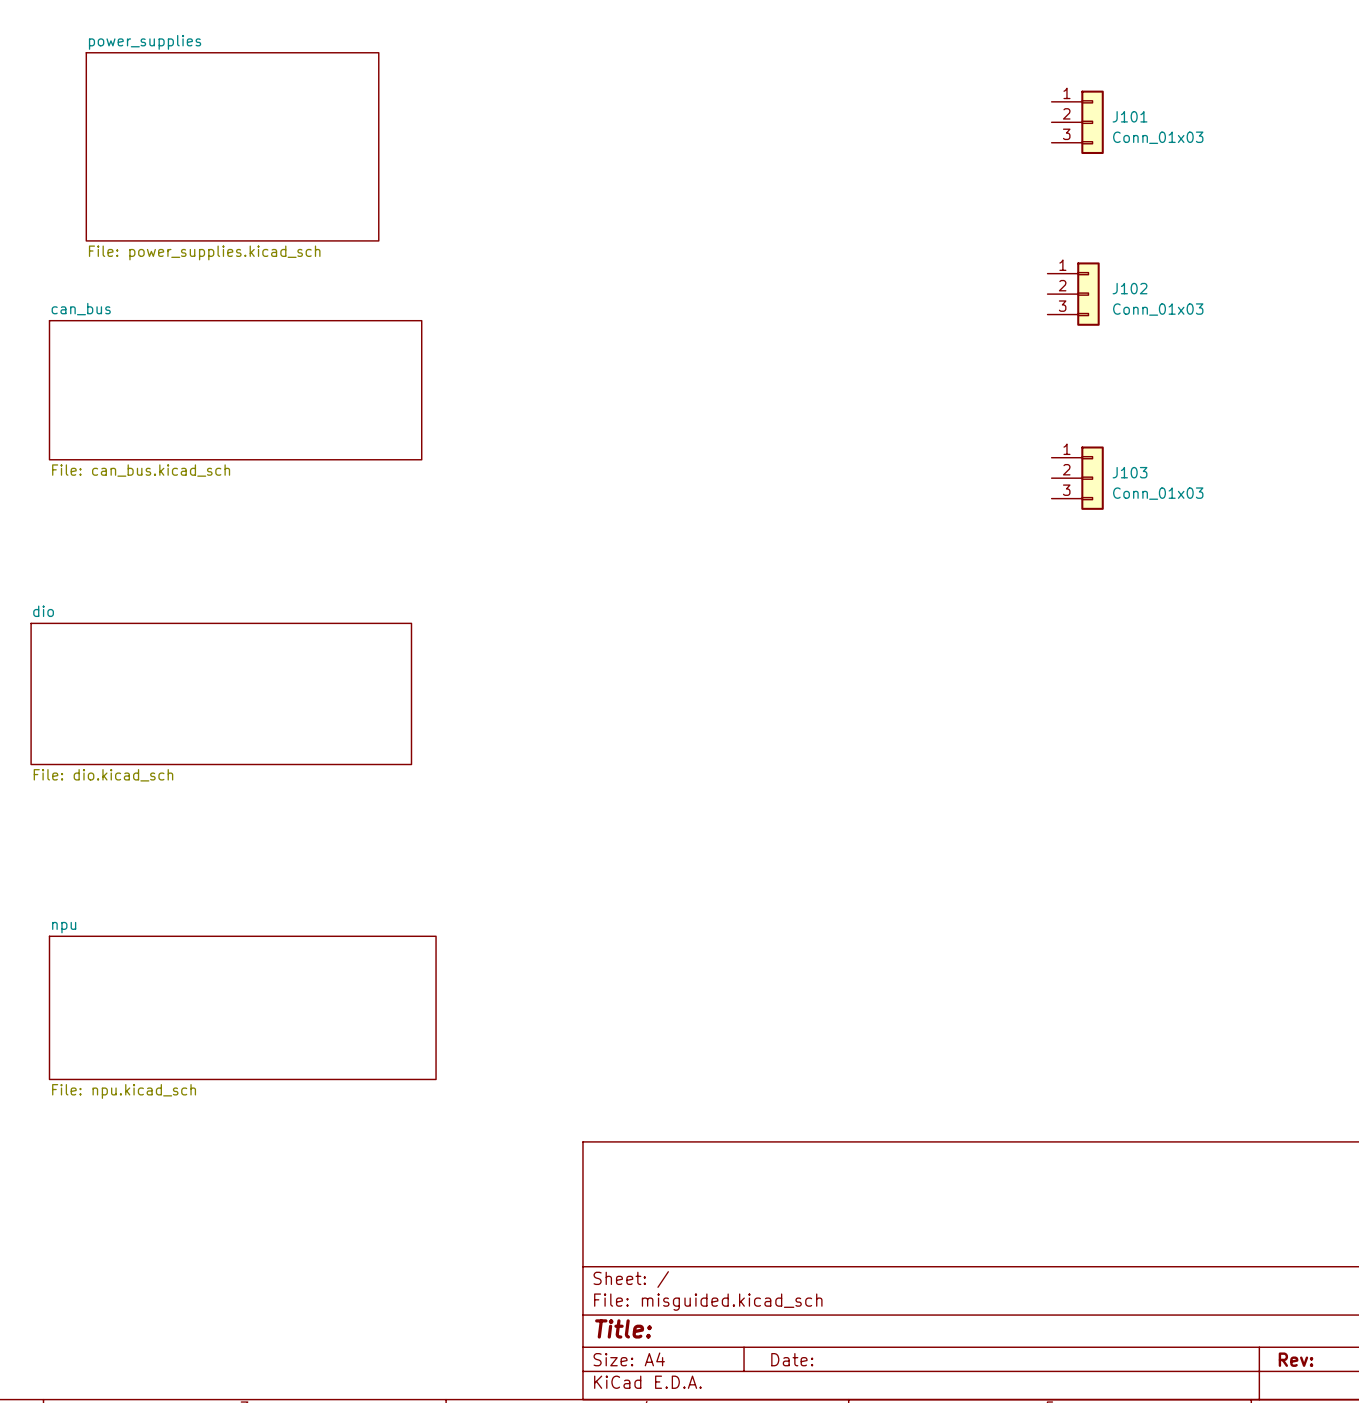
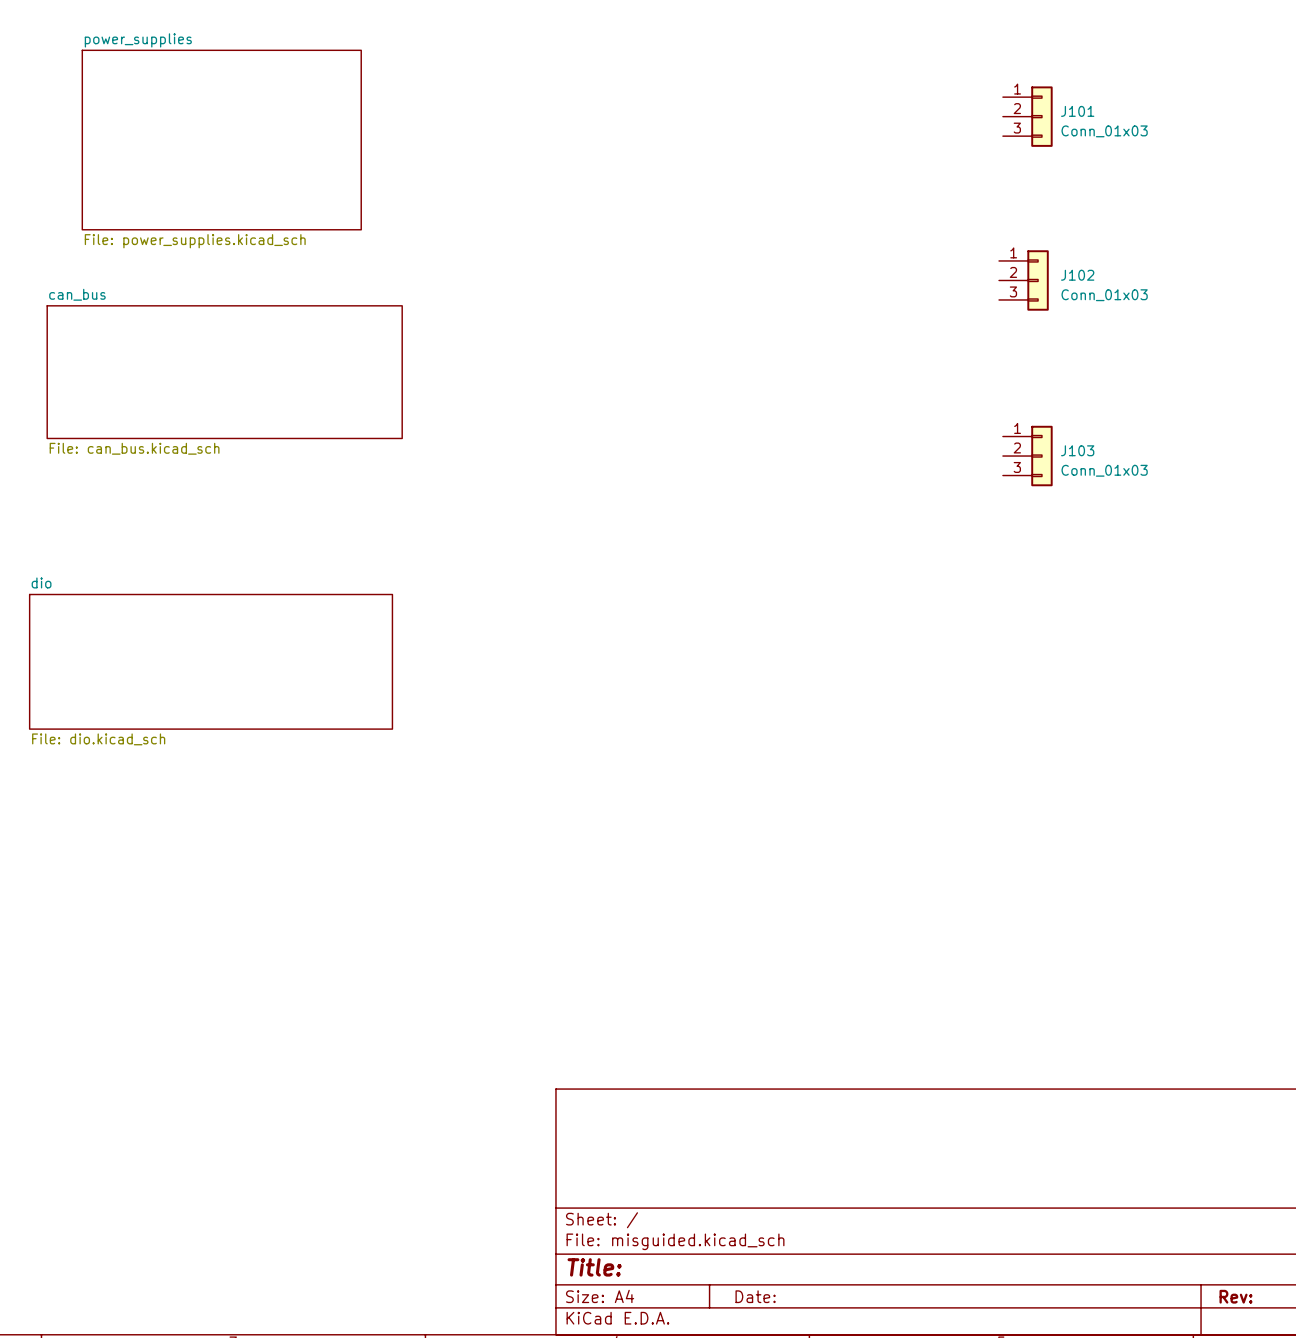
sheet npu: File: npu.kicad_sch (242, 1007) -> none

